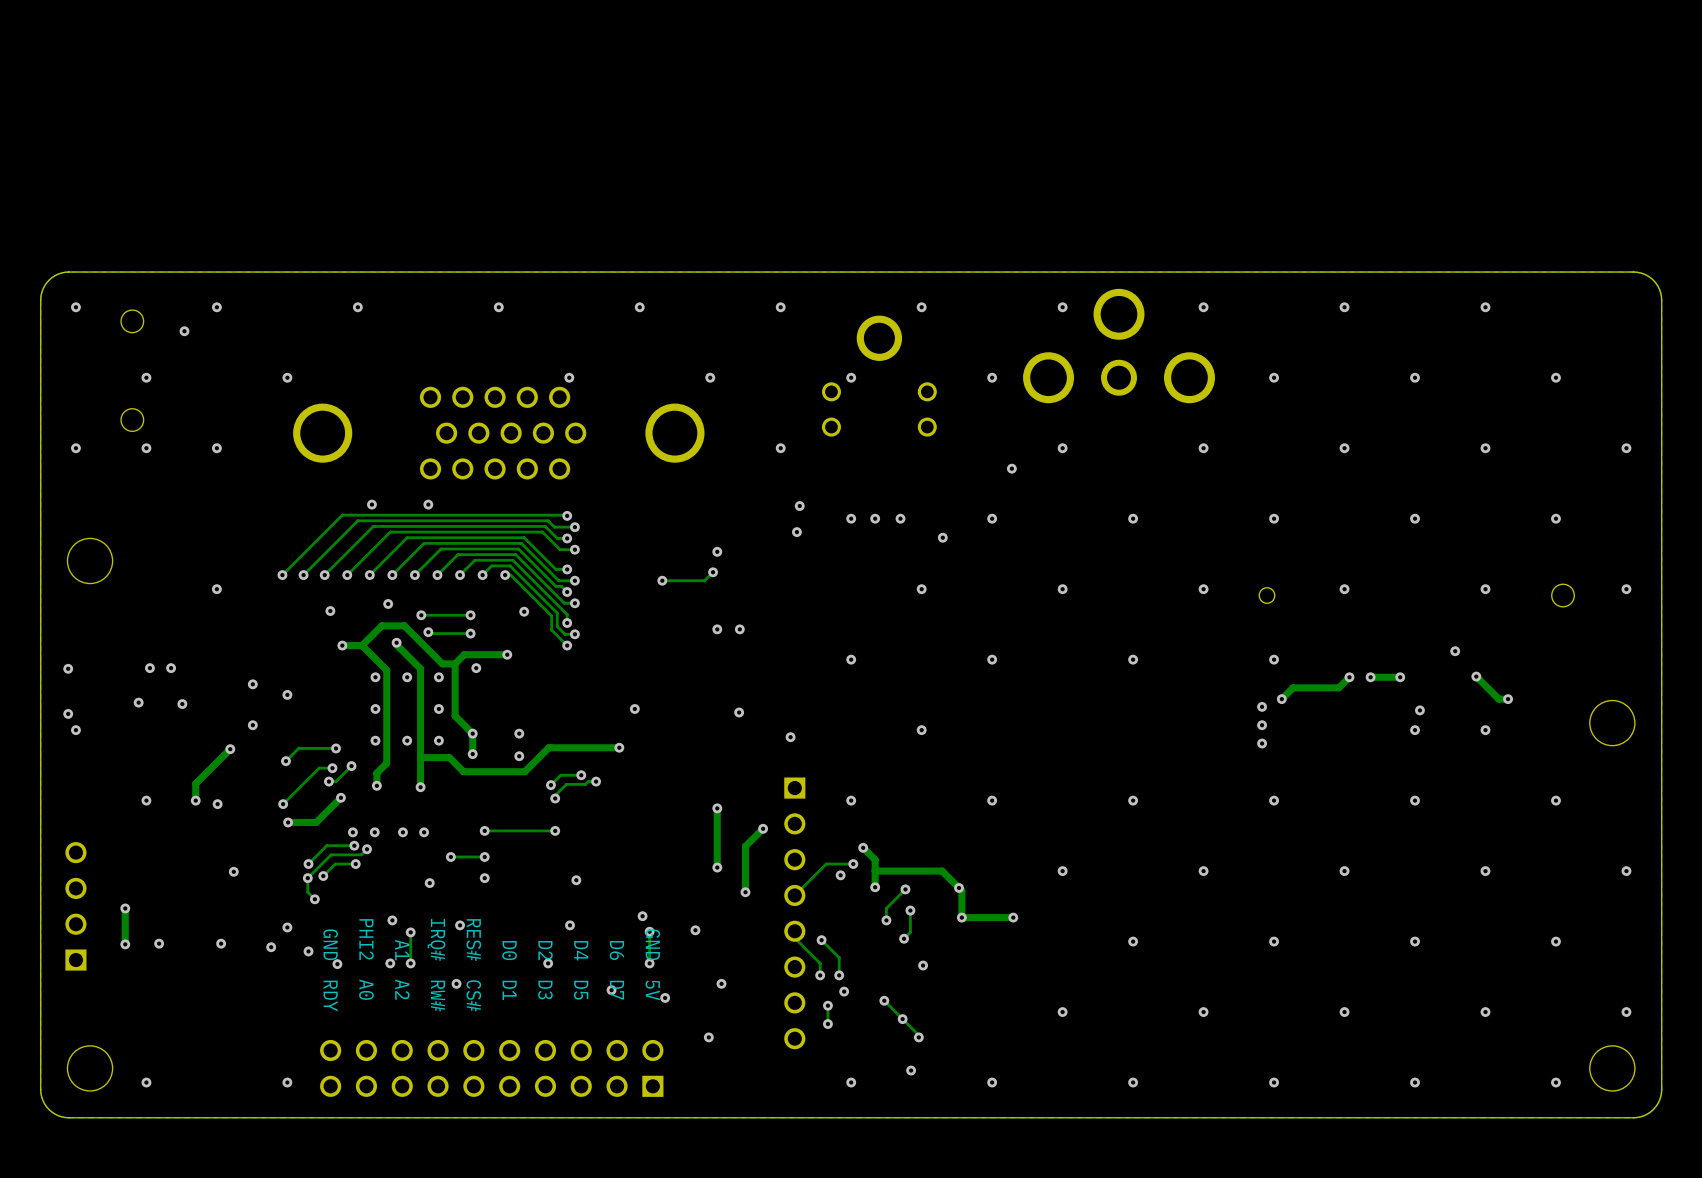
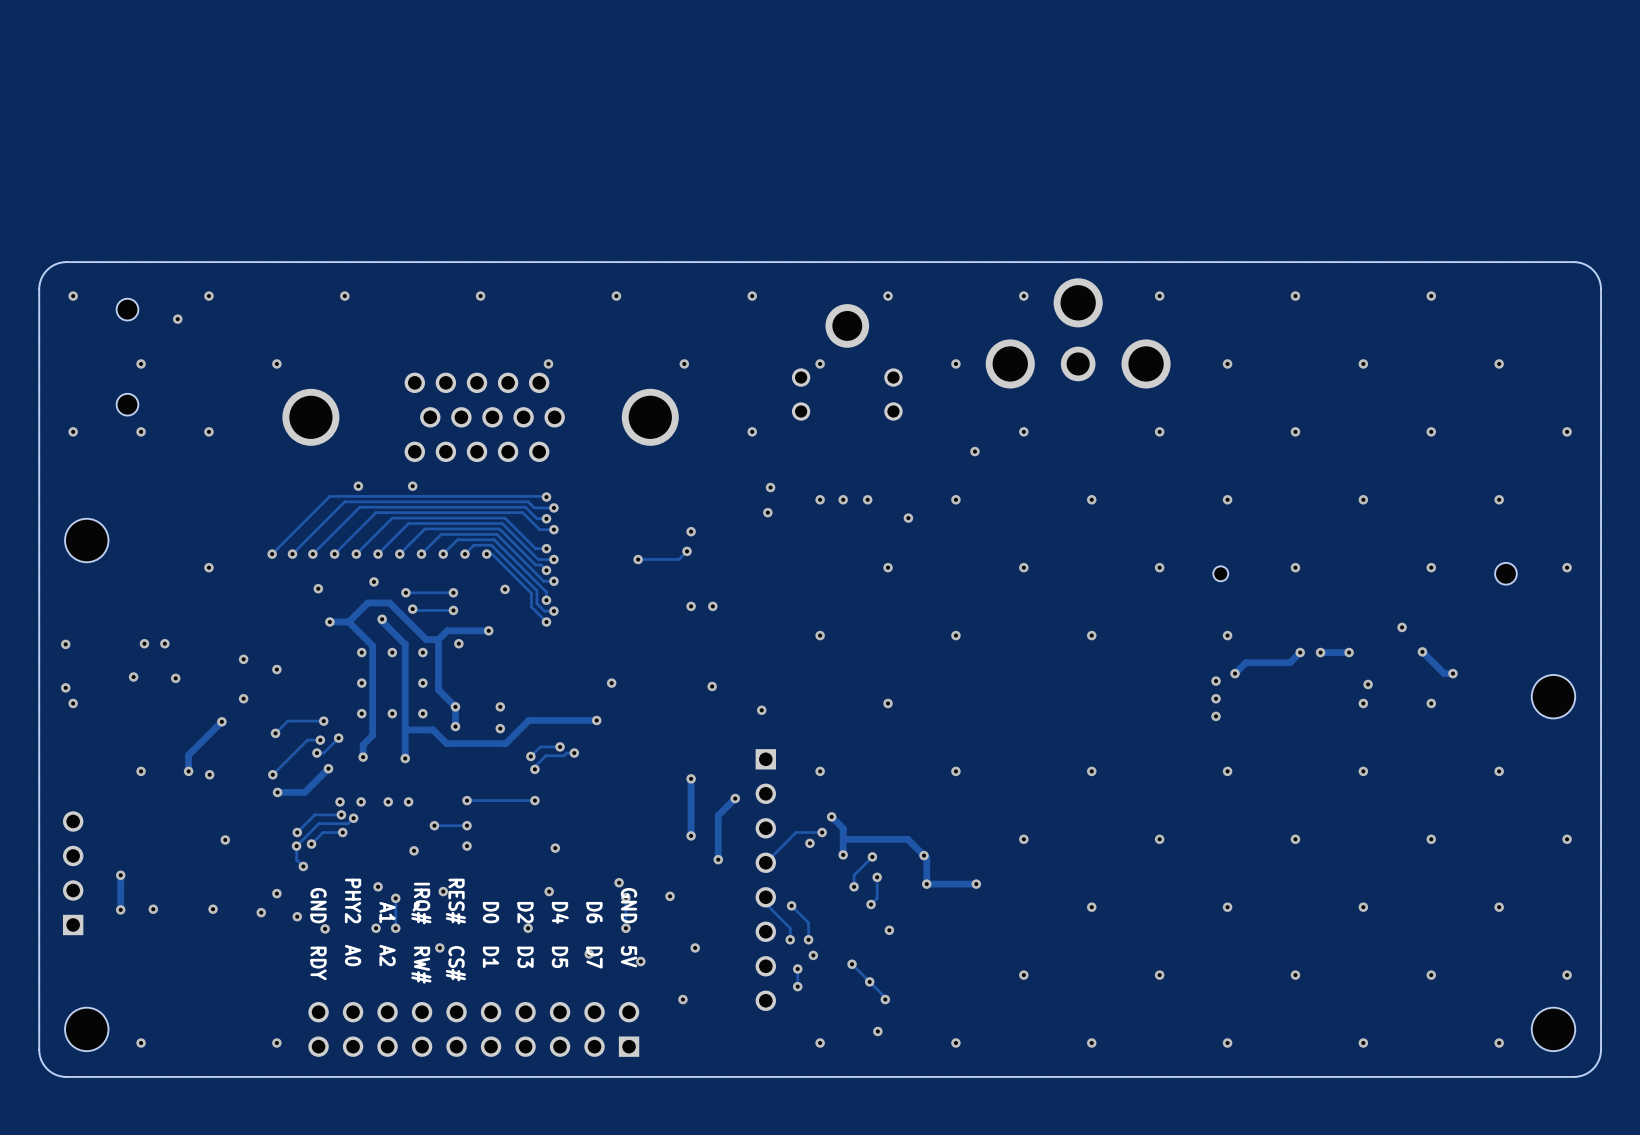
text: PHI2 (366, 939) -> PHY2 (353, 900)

